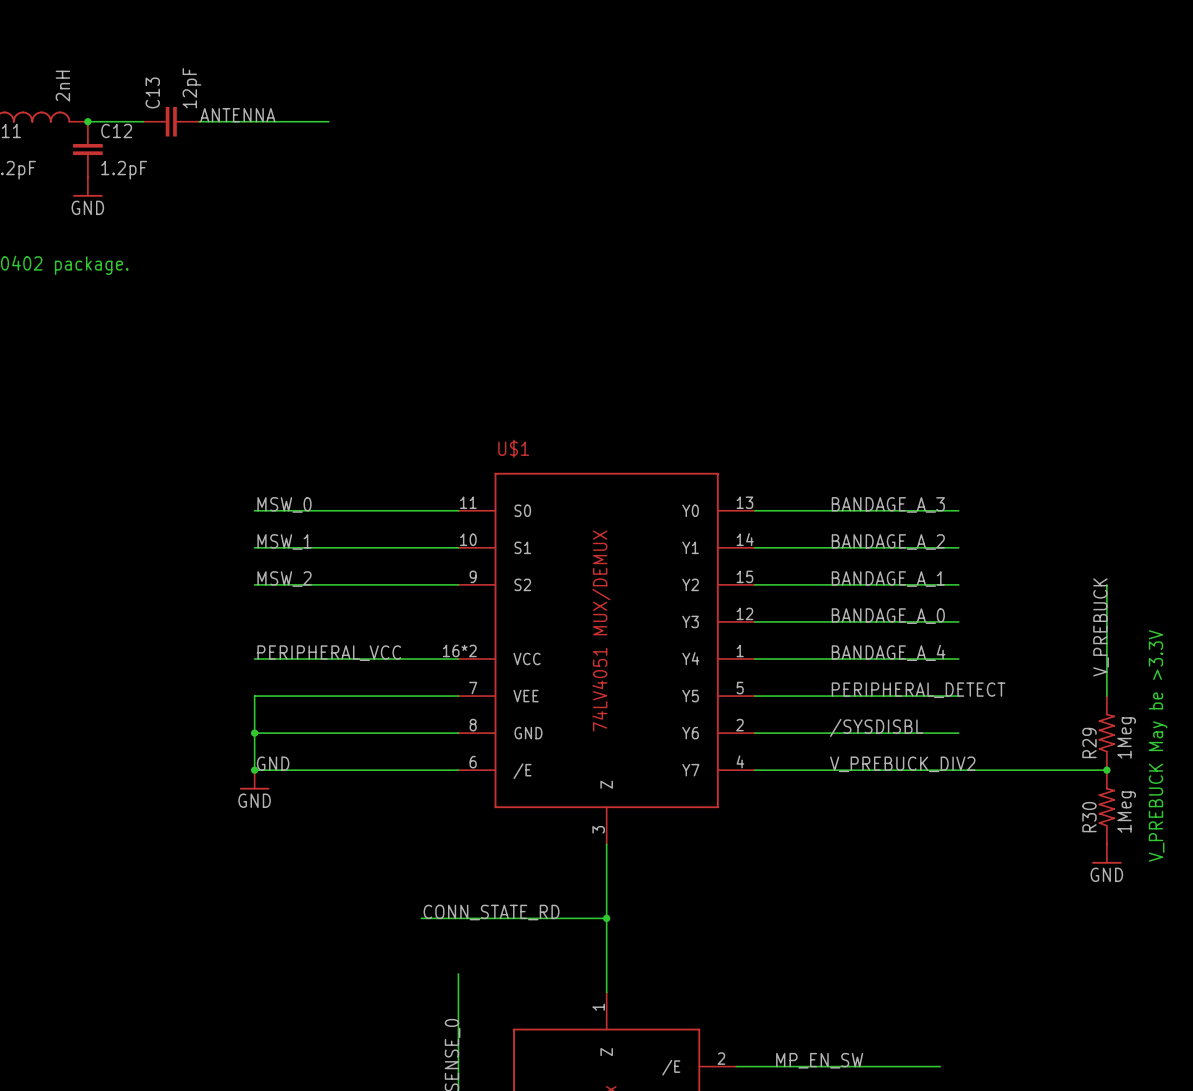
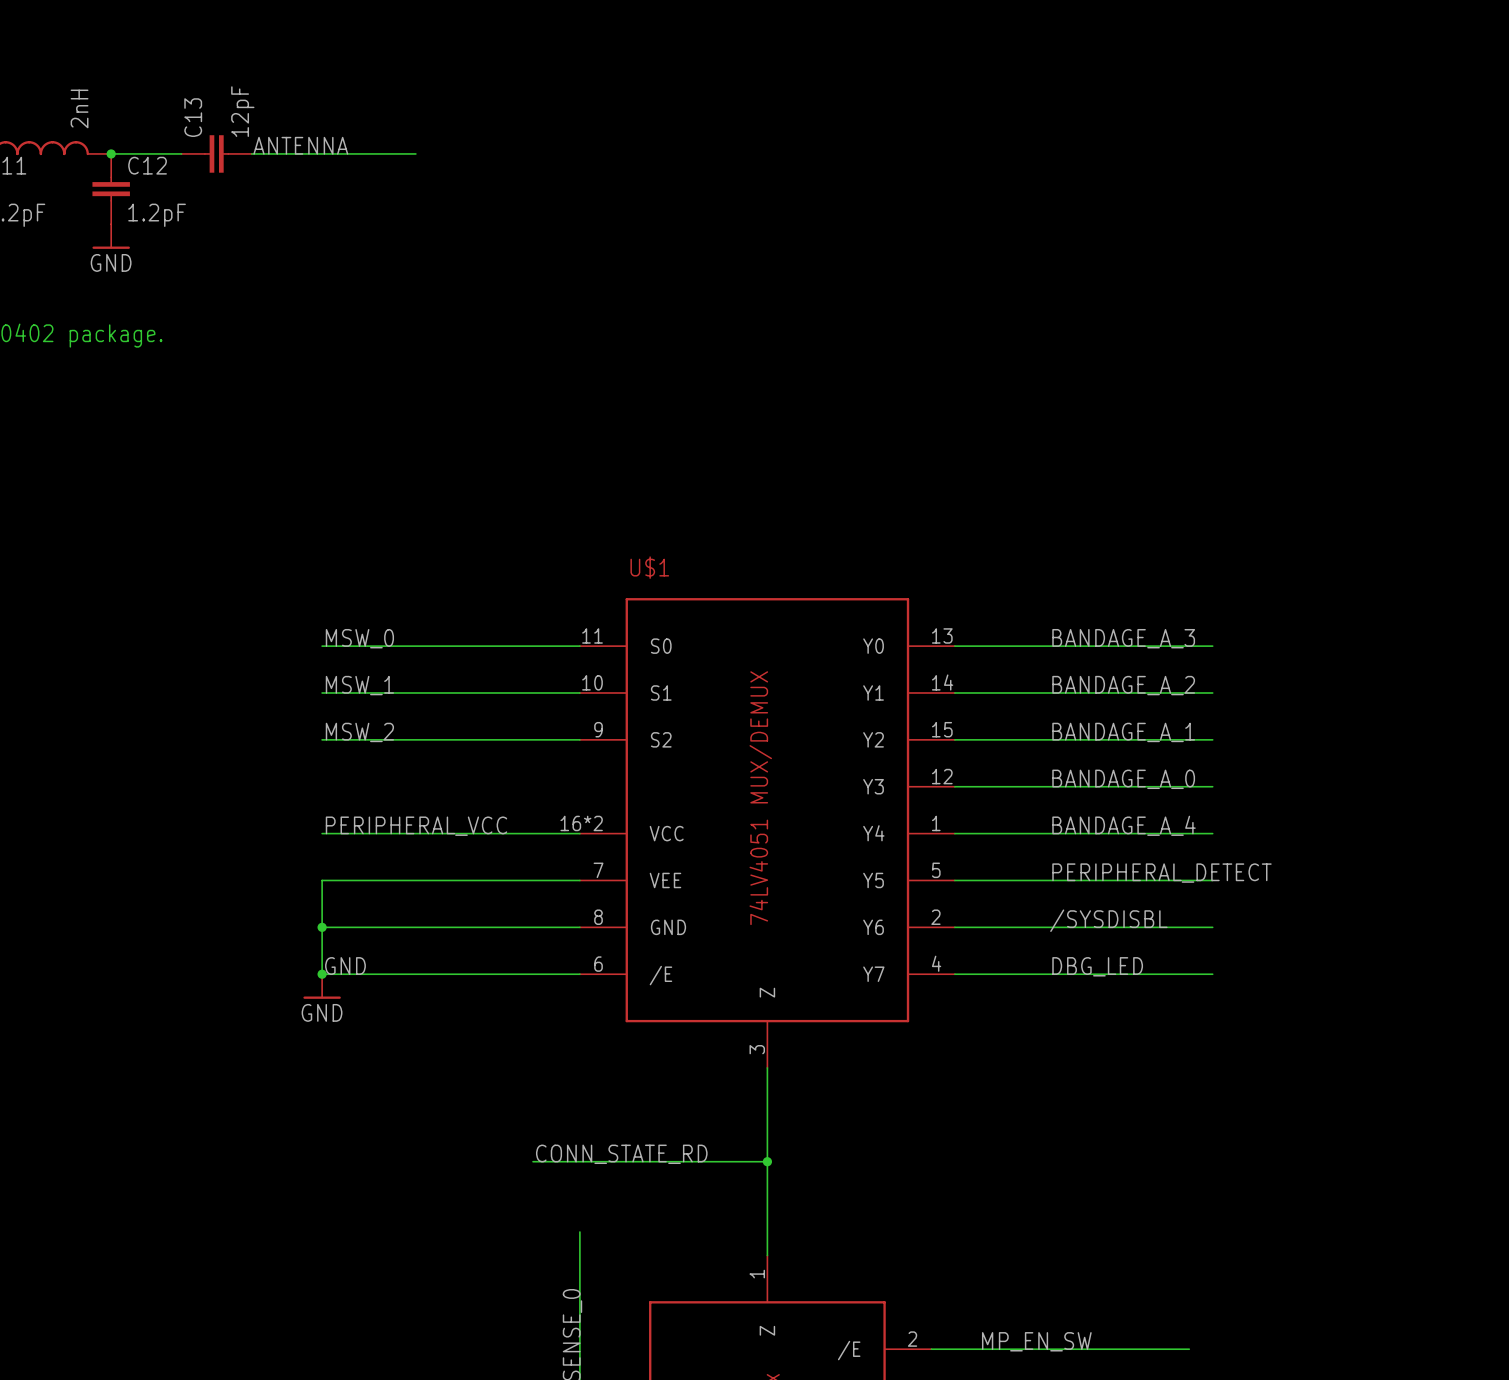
wire: (1106, 584) (1106, 696) -> none
label: V_PREBUCK (1101, 627) -> none
R29: 1Meg (1106, 733) -> none
text: V_PREBUCK May be >3.3V (1158, 745) -> none
label: V_PREBUCK_DIV2 (902, 764) -> DBG_LED (1097, 966)
wire: (958, 770) (1106, 770) -> none
junction: (1106, 770) -> none
R30: 1Meg (1106, 807) -> none
power symbol: GND (1106, 854) -> none

